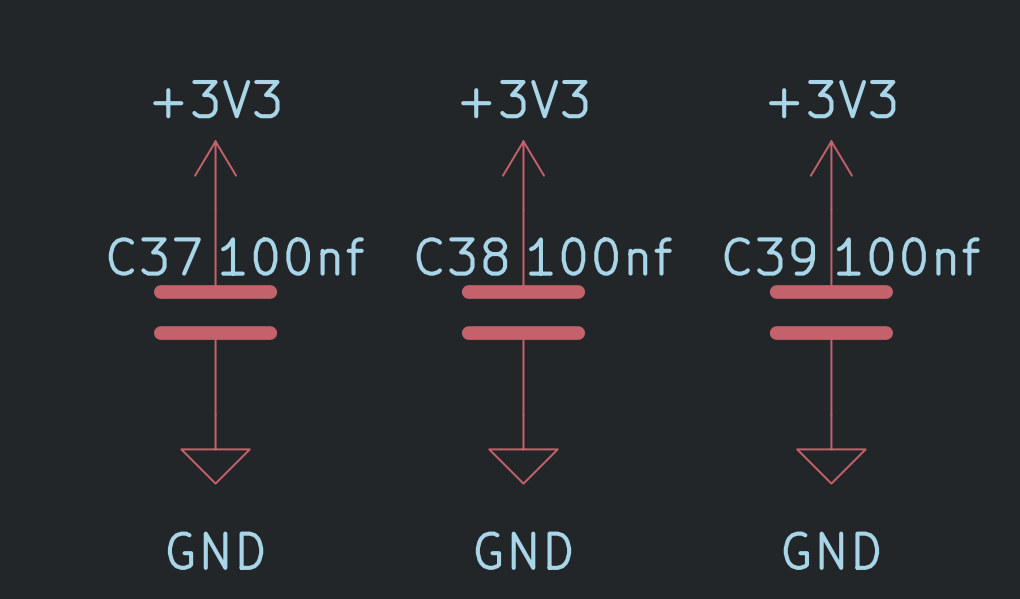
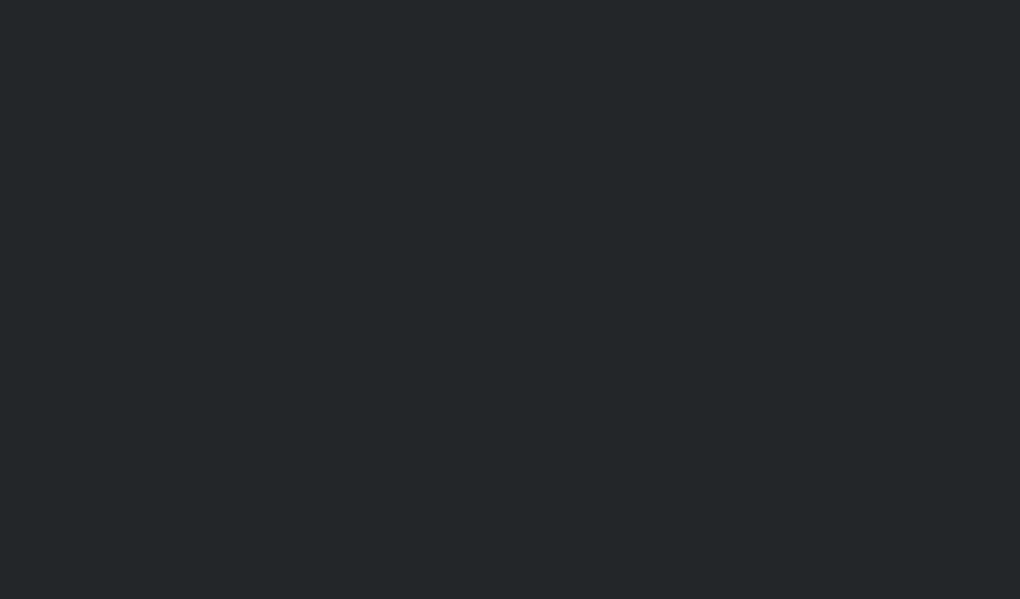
power symbol: +3V3 (215, 175) -> none
power symbol: +3V3 (523, 175) -> none
power symbol: +3V3 (831, 175) -> none
C37: 100nf (215, 312) -> none
C38: 100nf (523, 312) -> none
C39: 100nf (831, 312) -> none
power symbol: GND (215, 449) -> none
power symbol: GND (523, 449) -> none
power symbol: GND (831, 449) -> none

